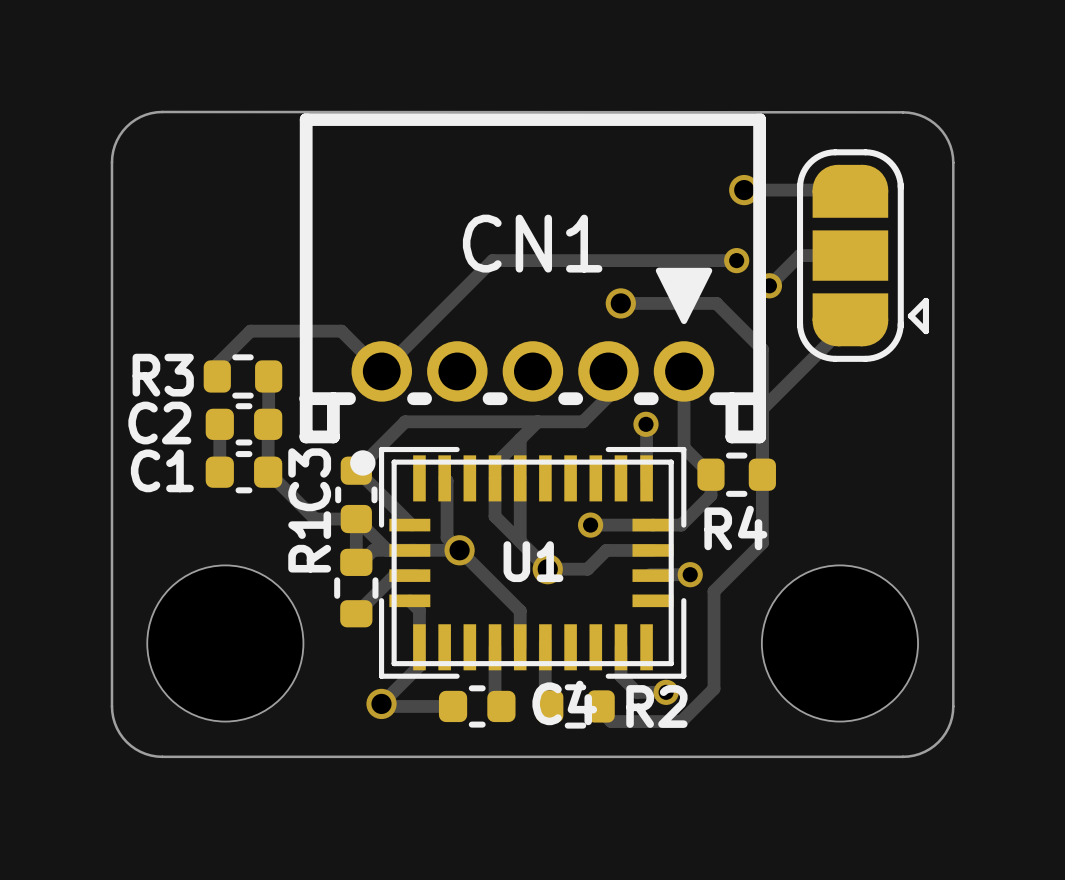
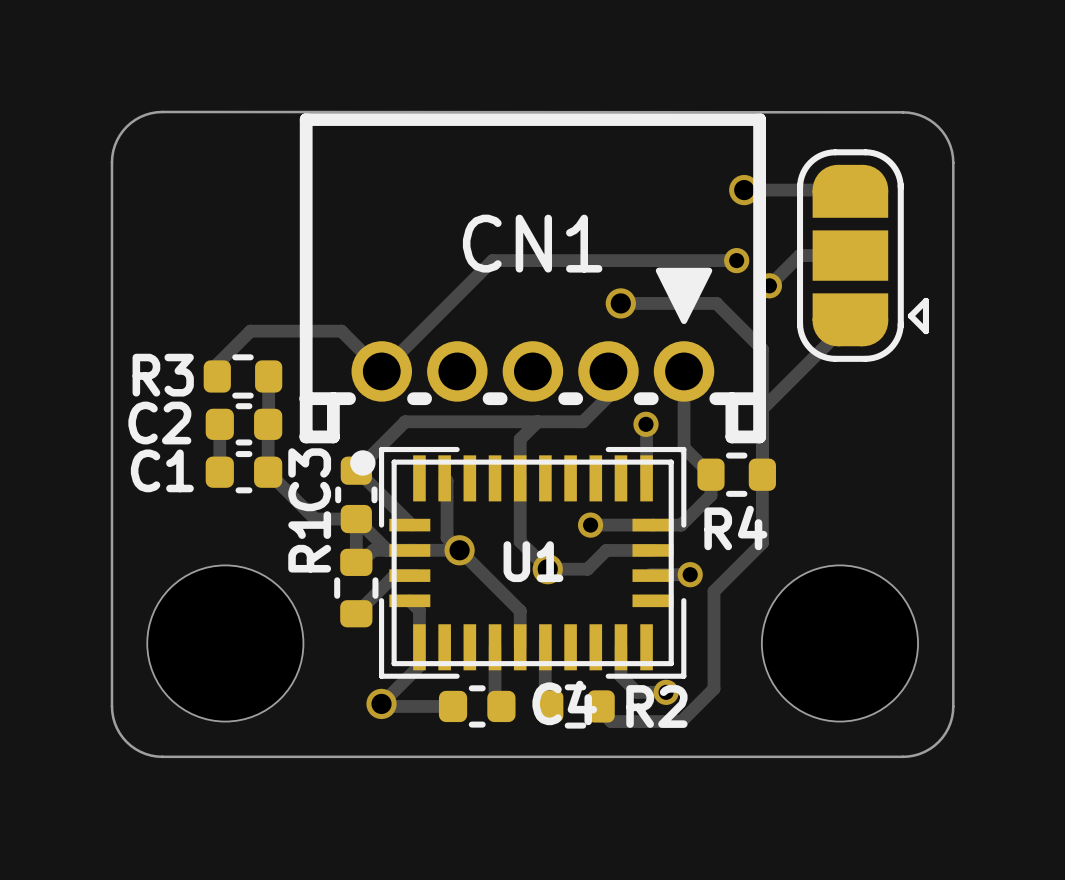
track: (520, 439) (495, 464) (495, 516) (520, 541) -> none

